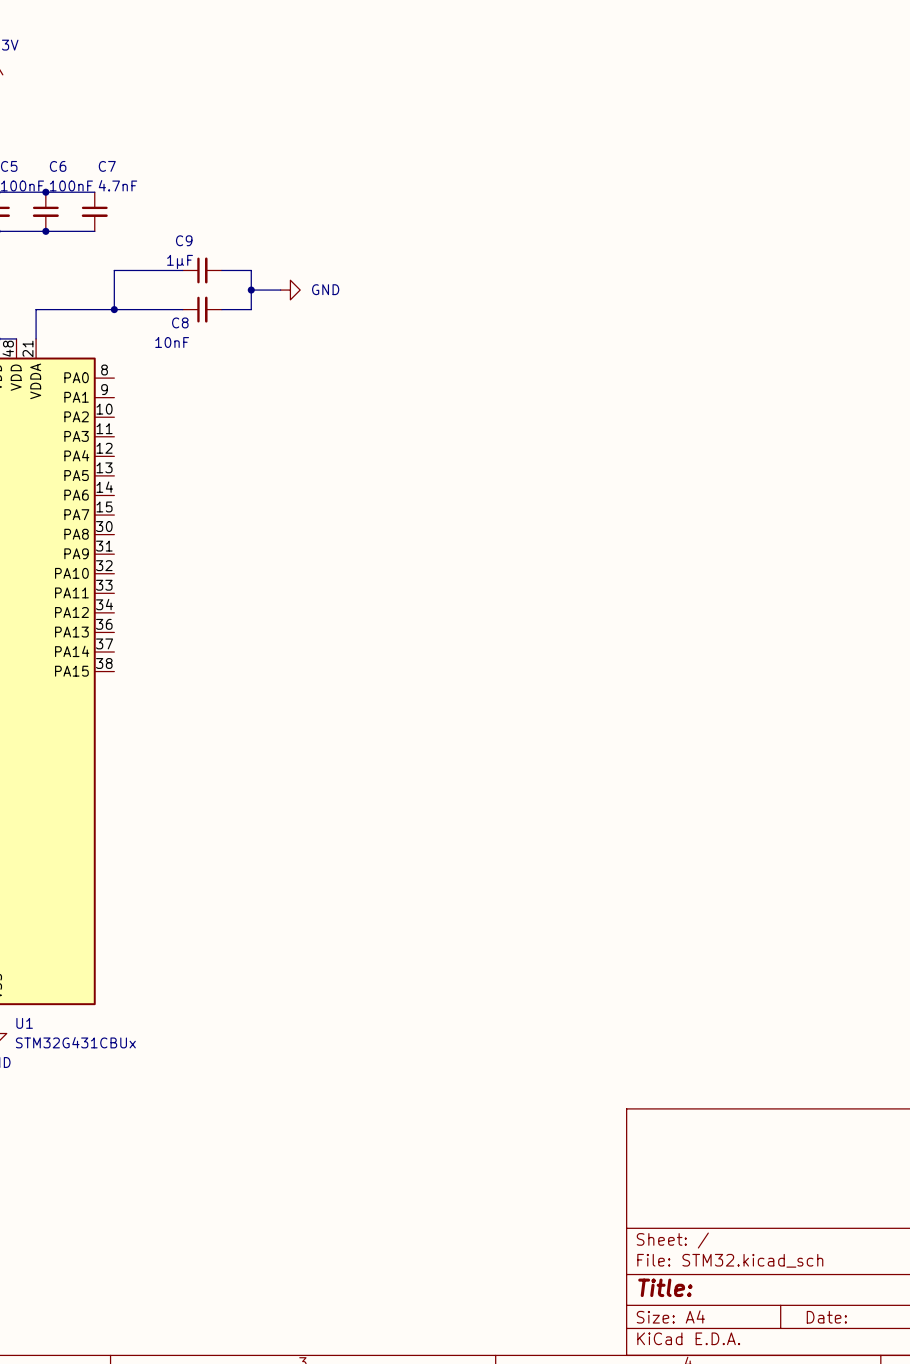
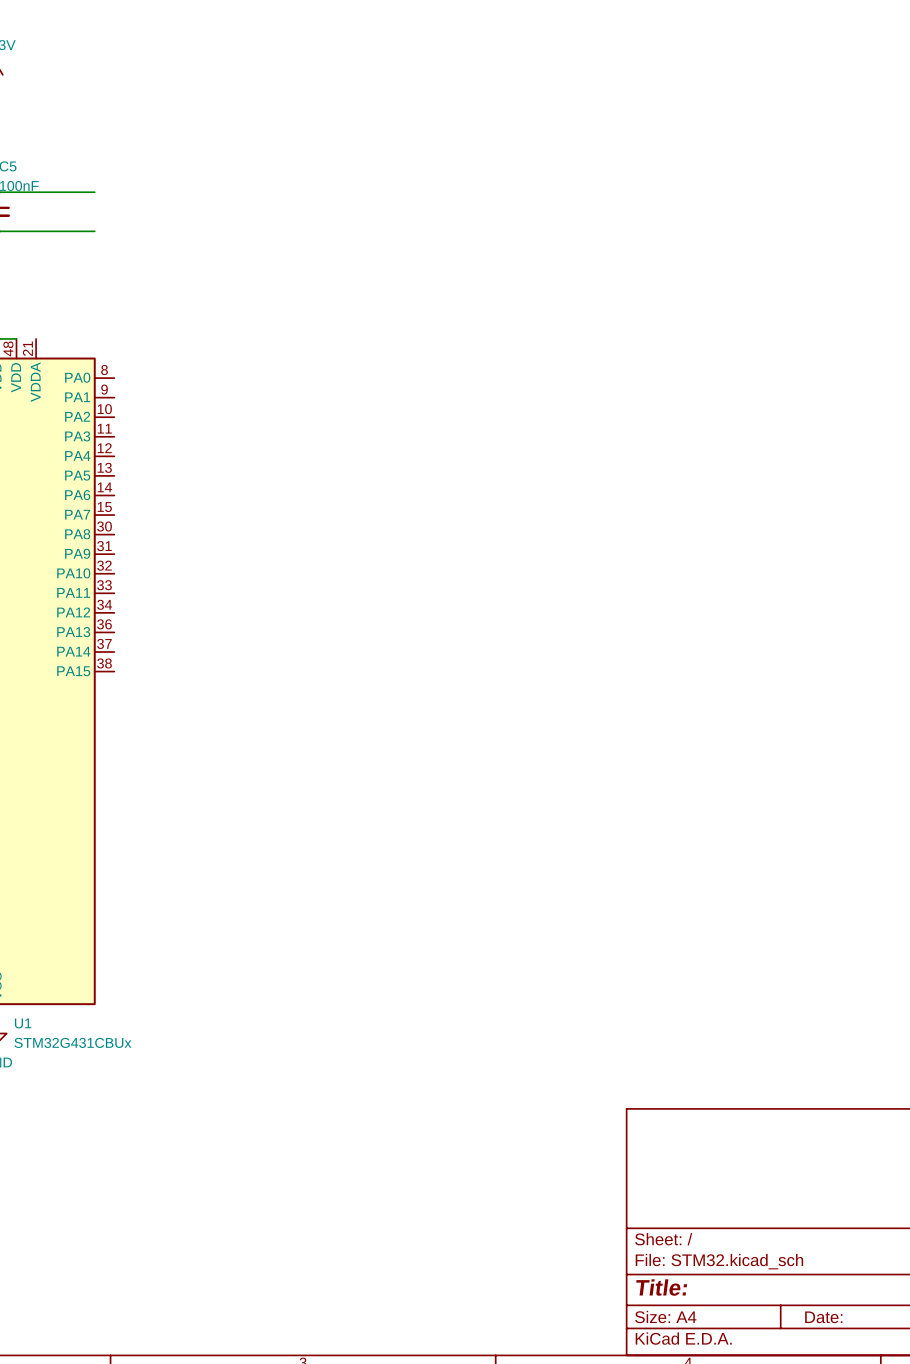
junction: (45, 192) -> none
C6: 100nF (45, 211) -> none
C7: 4.7nF (94, 211) -> none
junction: (45, 231) -> none
wire: (182, 270) (114, 270) (114, 309) -> none
C9: 1µF (202, 270) -> none
wire: (221, 270) (251, 270) (251, 309) (221, 309) -> none
wire: (251, 290) (280, 290) -> none
junction: (251, 290) -> none
power symbol: GND (290, 290) -> none
junction: (114, 309) -> none
wire: (182, 309) (36, 309) (36, 338) -> none
C8: 10nF (202, 309) -> none

